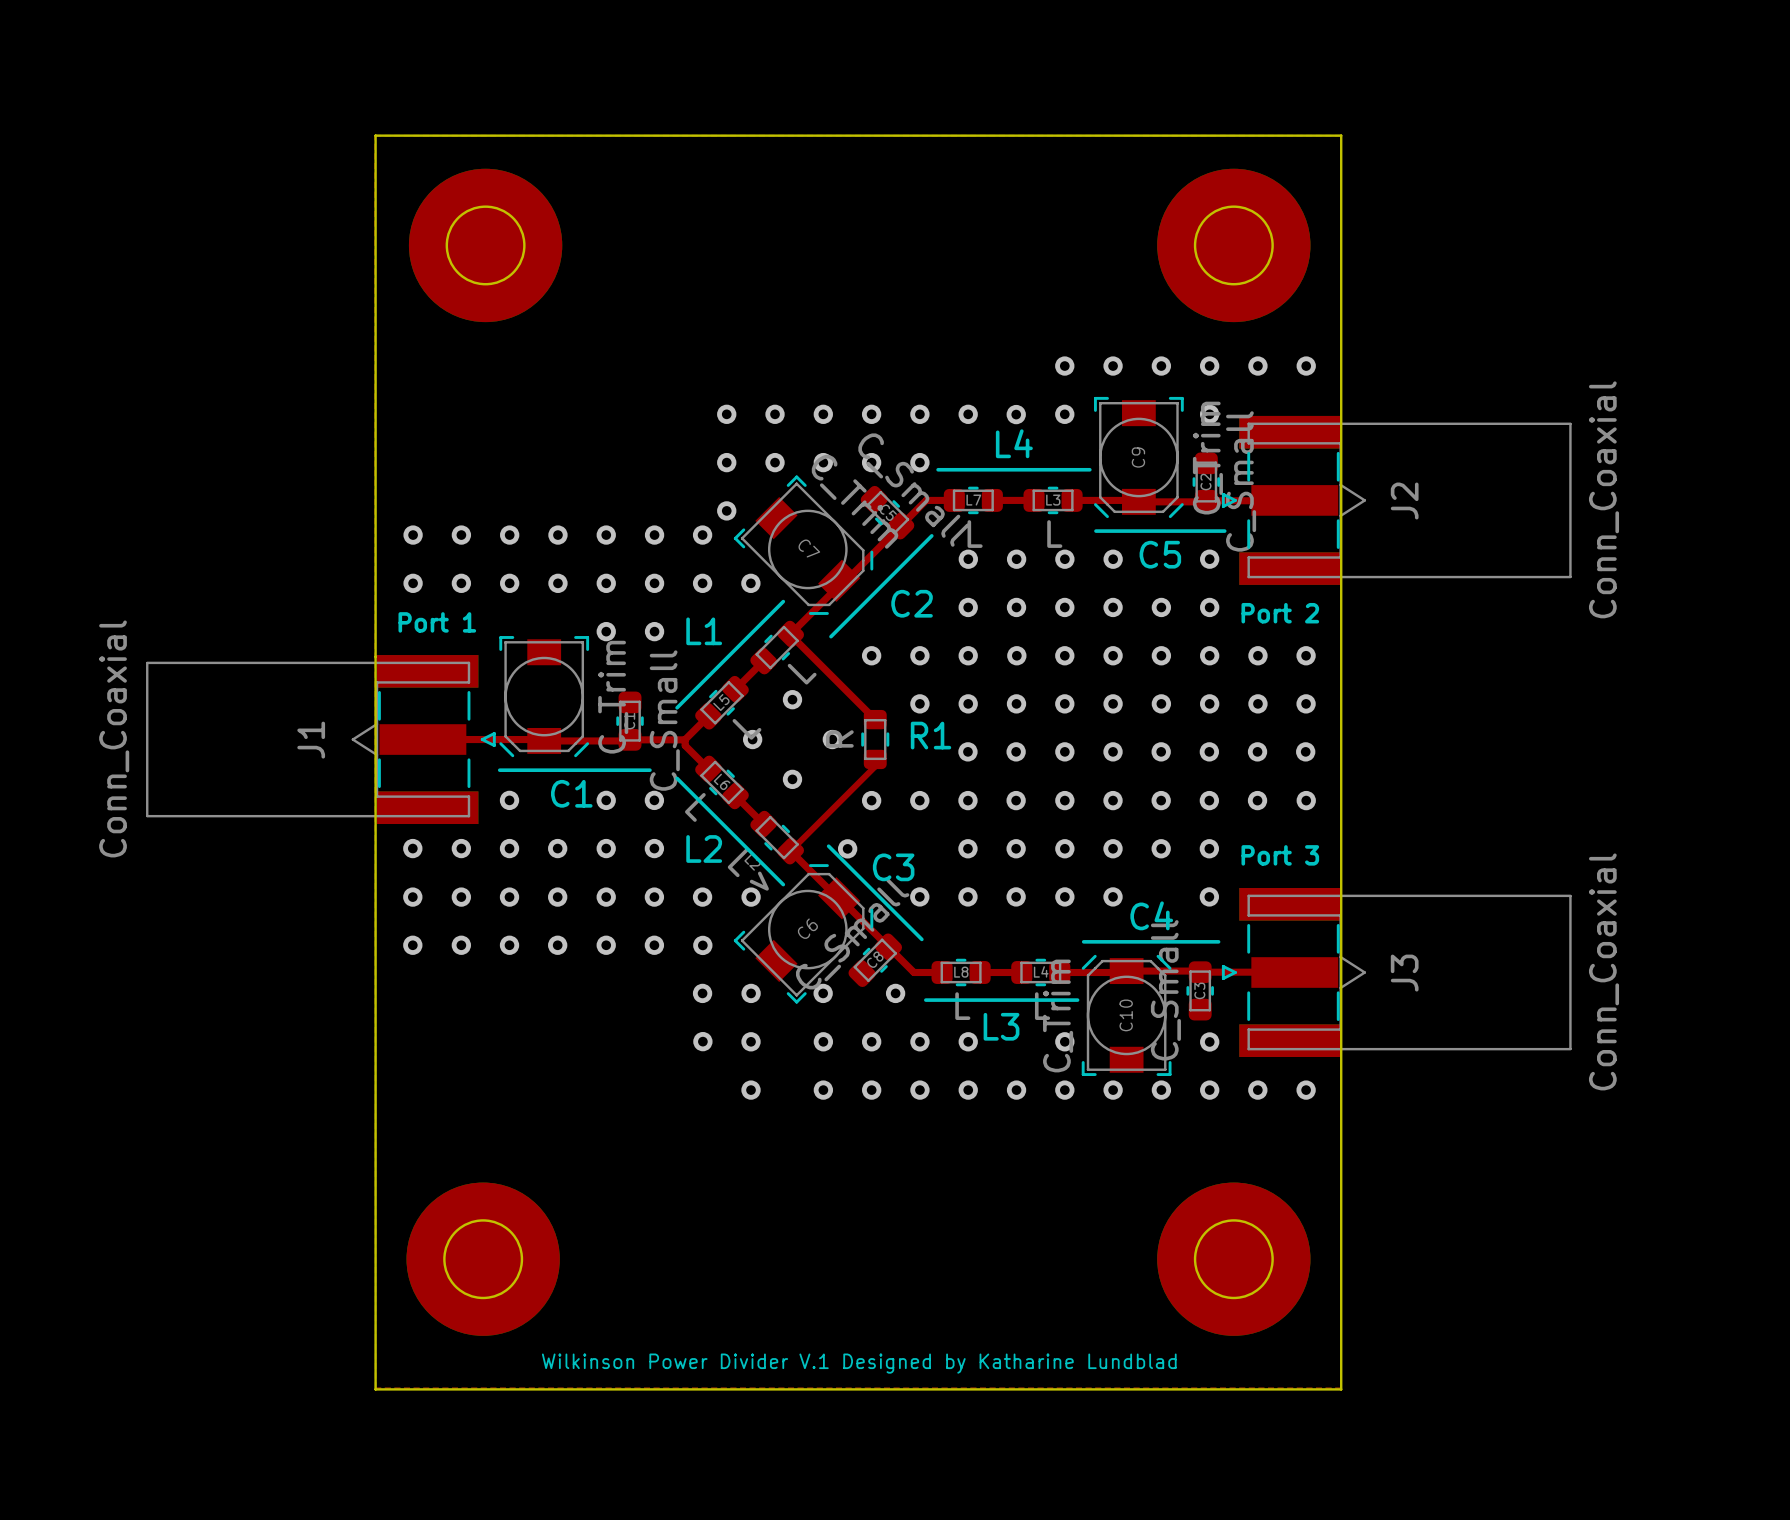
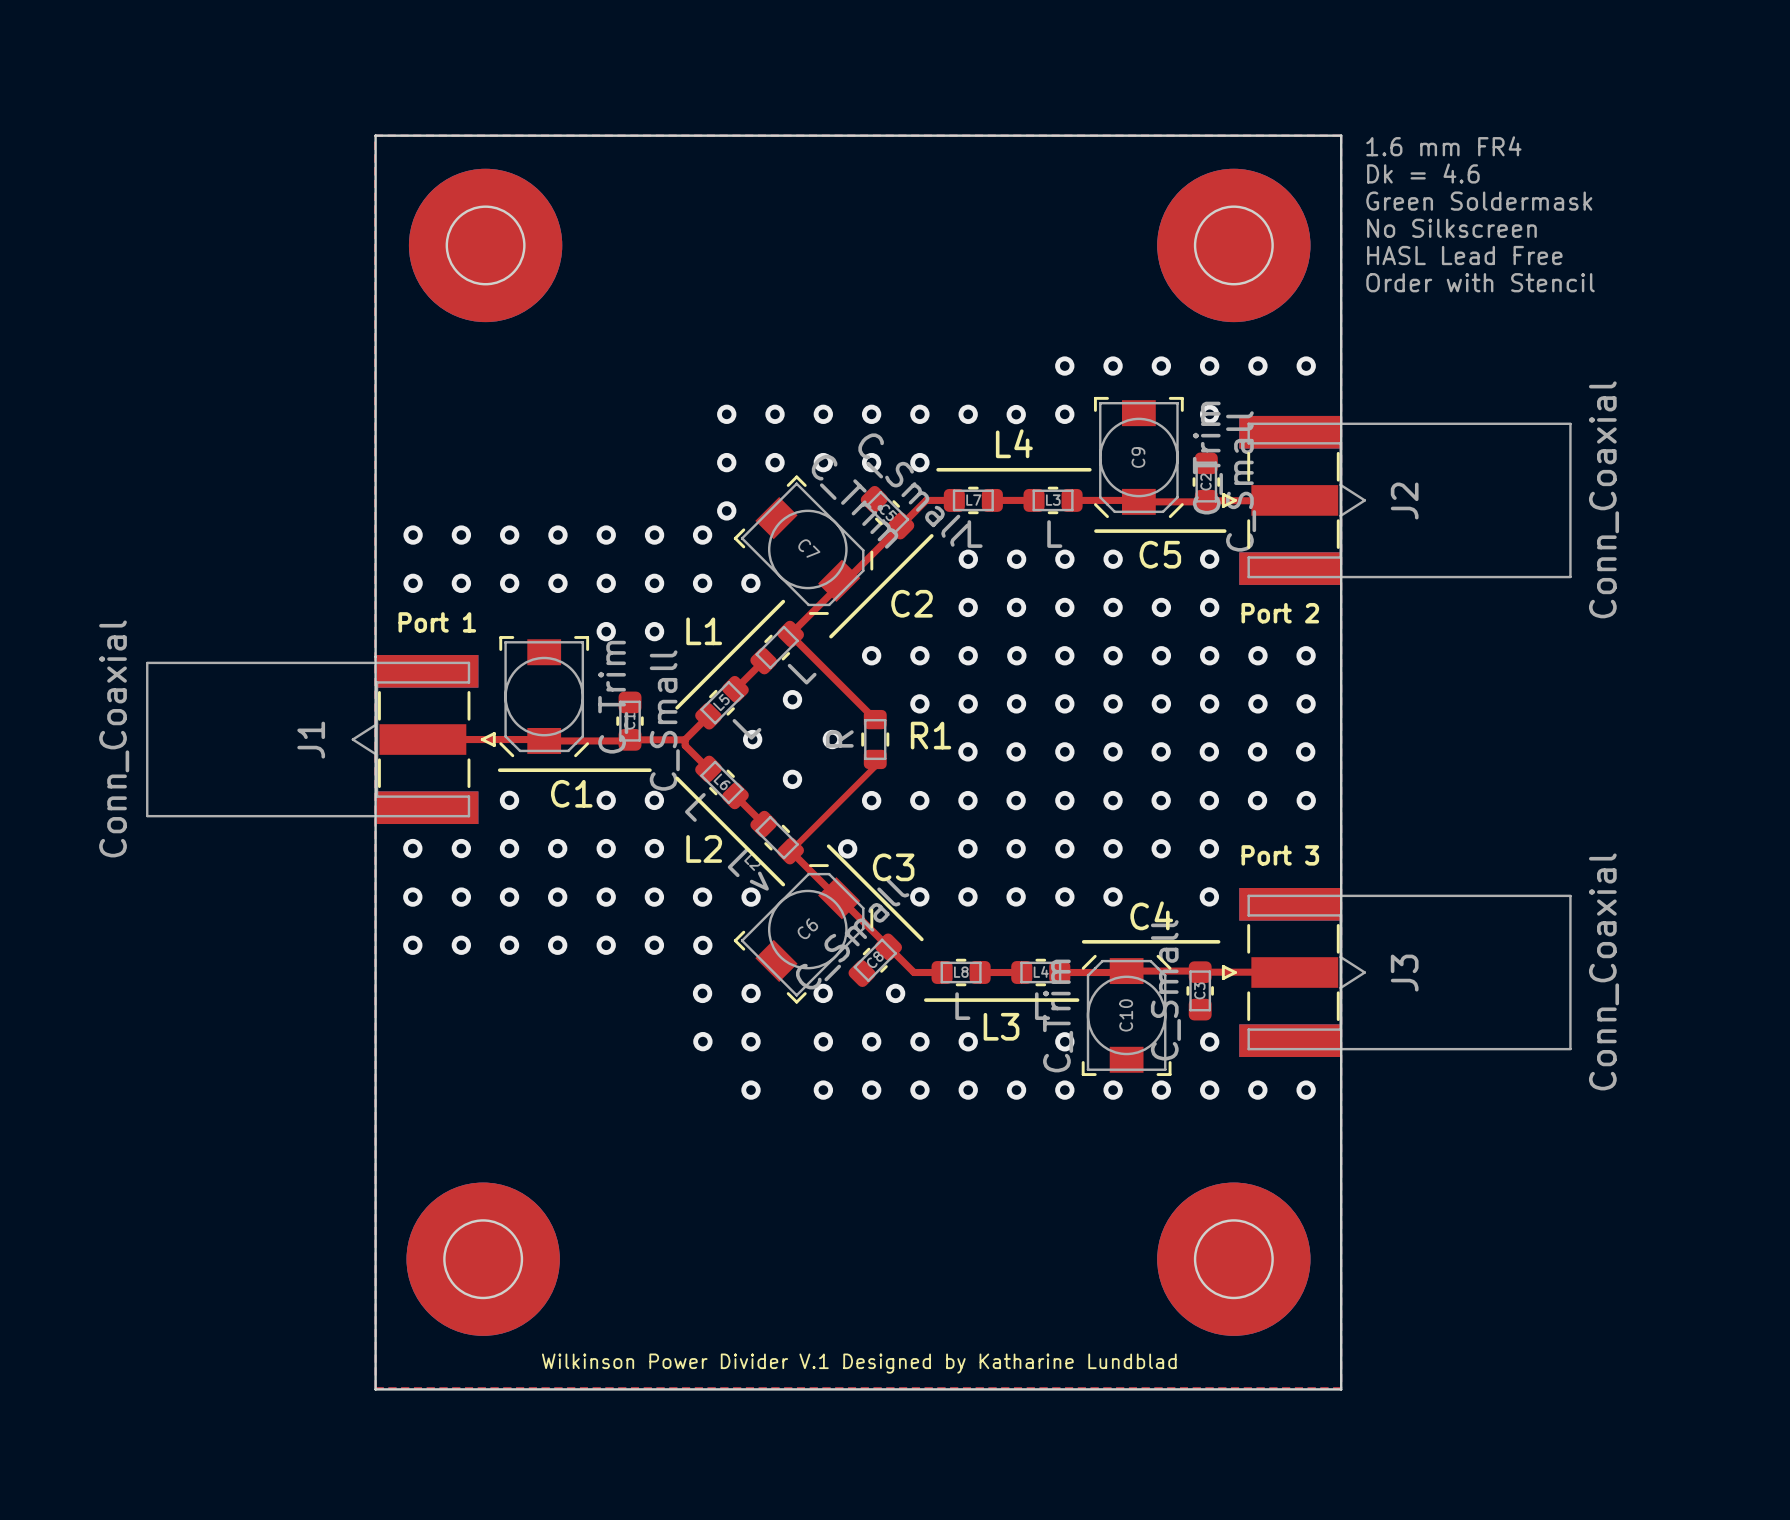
text: none -> 1.6 mm FR4 (1443, 146)
text: none -> Dk = 4.6 (1423, 173)
text: none -> Green Soldermask (1479, 201)
text: none -> No Silkscreen (1451, 228)
text: none -> HASL Lead Free (1464, 255)
text: none -> Order with Stencil (1480, 282)

